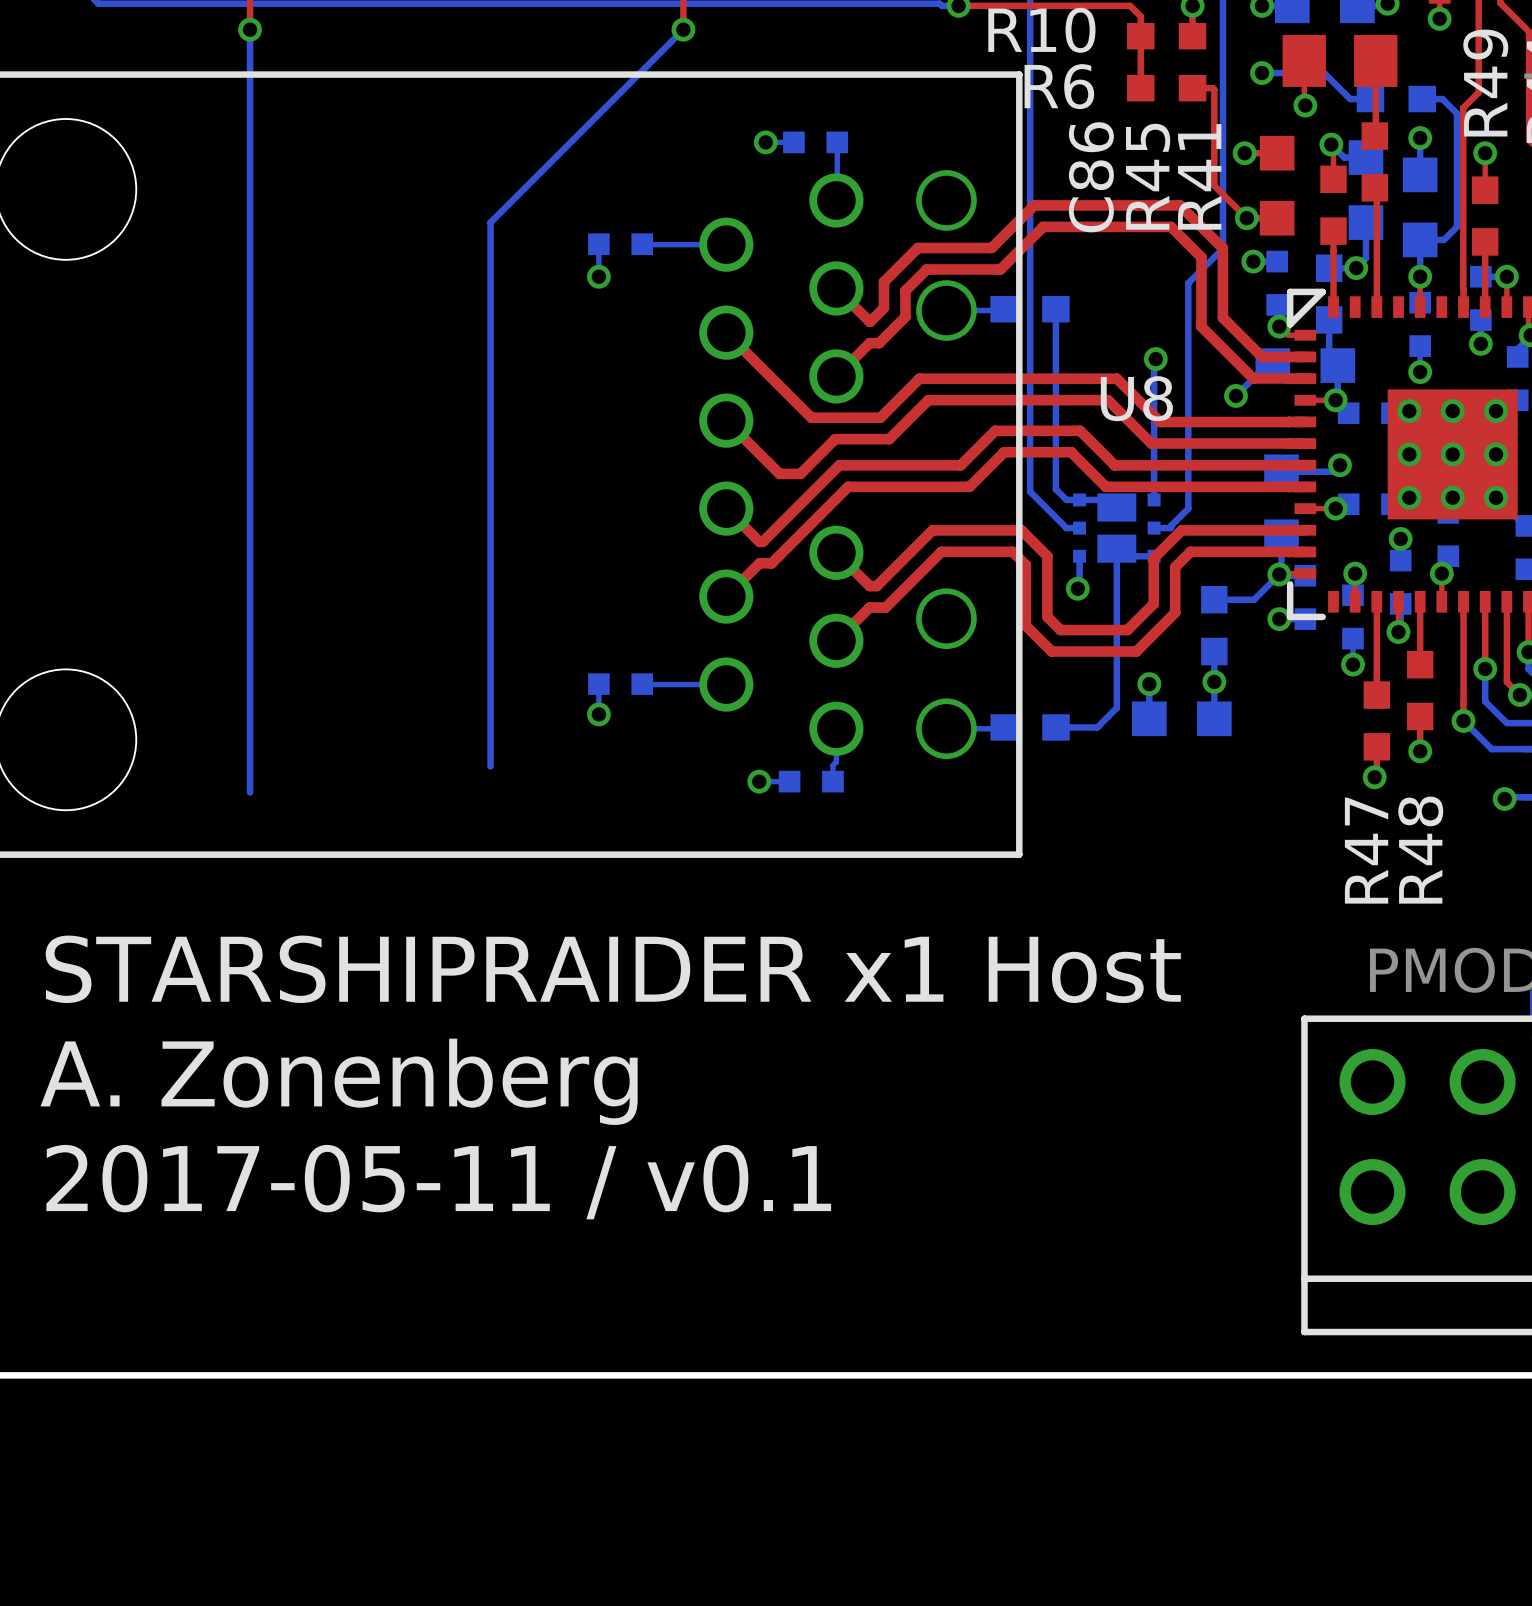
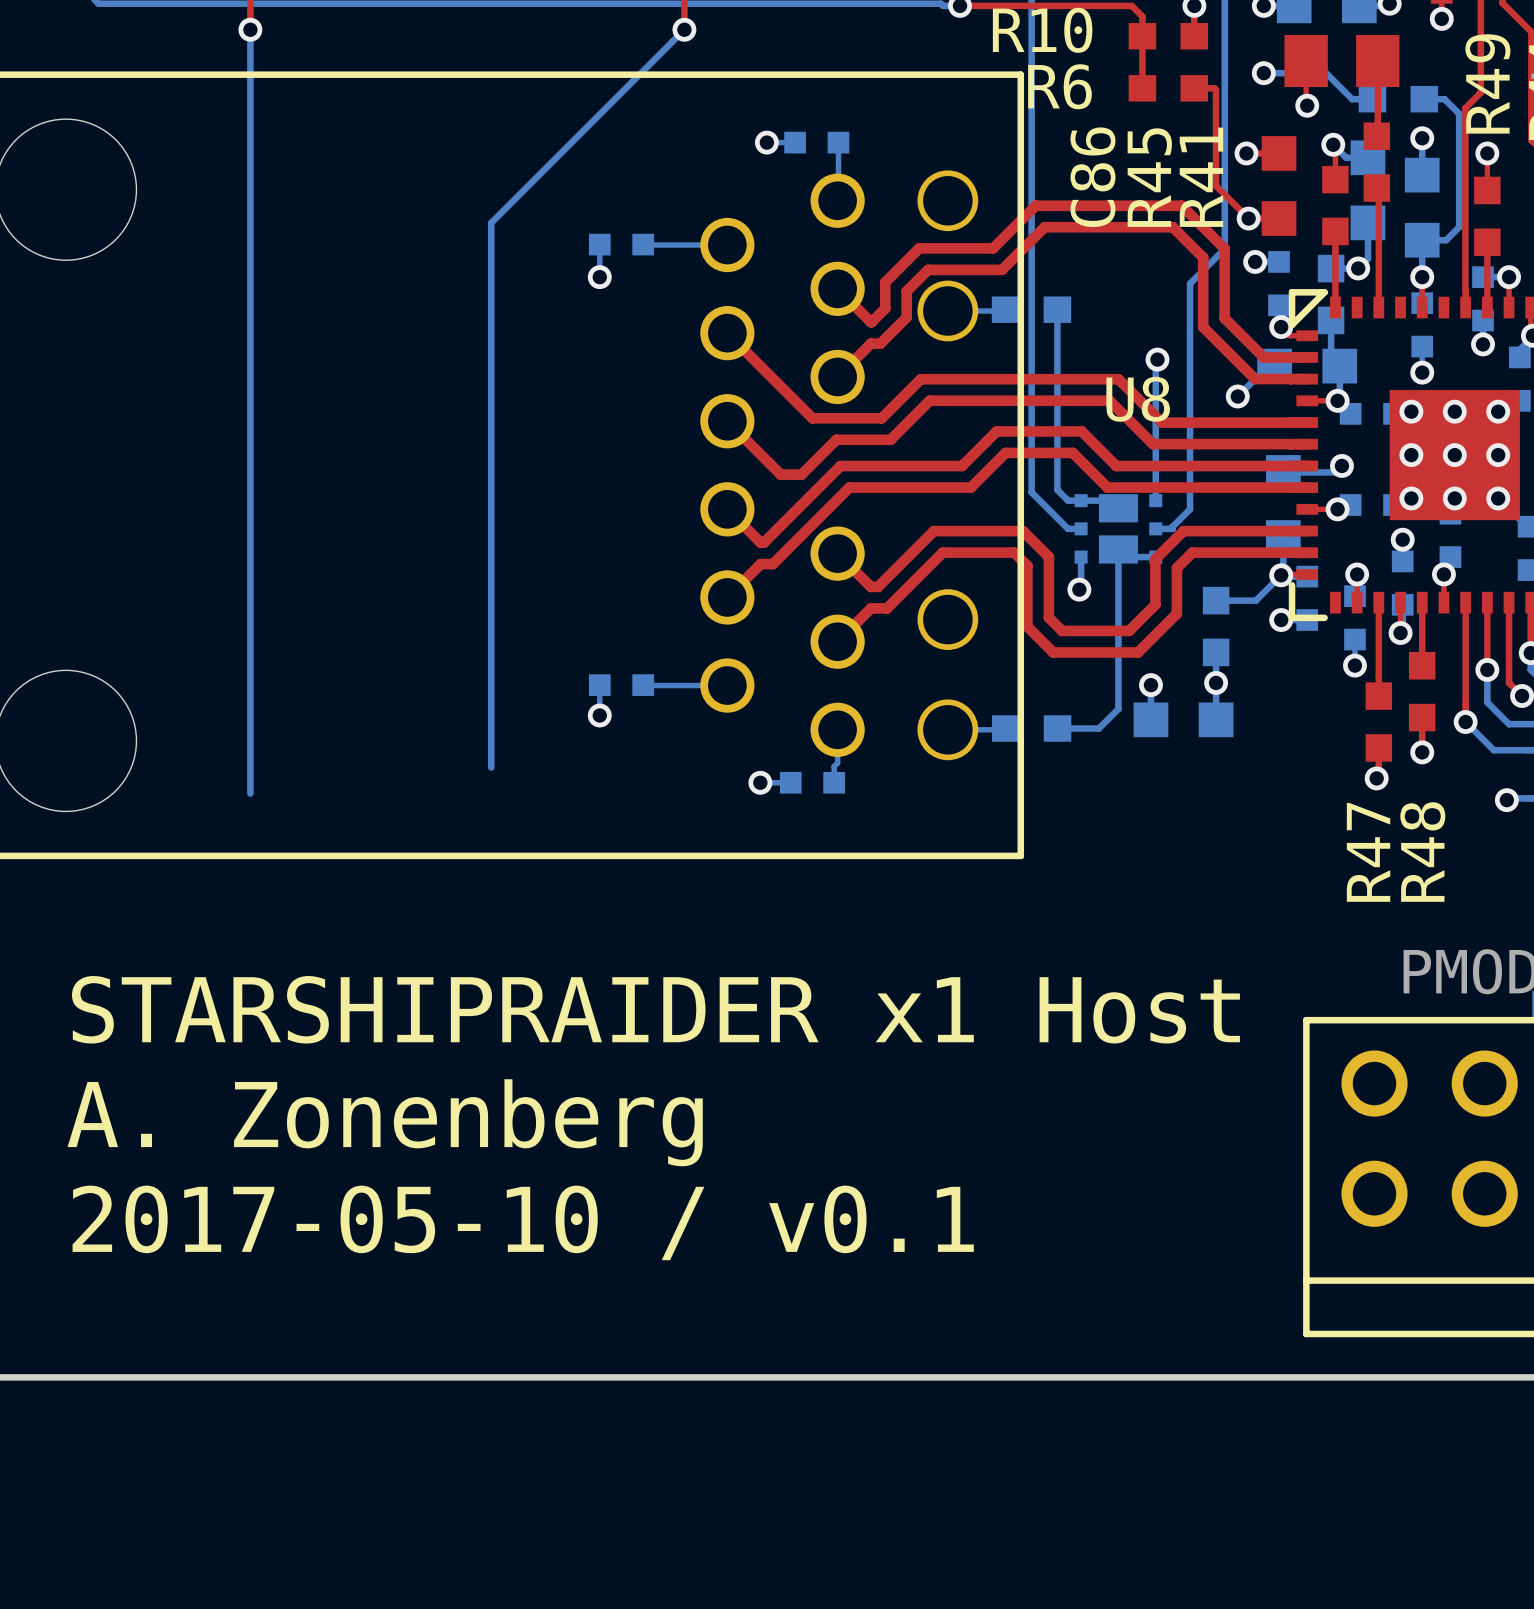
text position: STARSHIPRAIDER x1 Host (613, 969) -> STARSHIPRAIDER x1 Host (655, 1009)
text position: A. Zonenberg (339, 1081) -> A. Zonenberg (385, 1122)
text: 2017-05-11 / v0.1 (438, 1182) -> 2017-05-10 / v0.1 (523, 1222)

